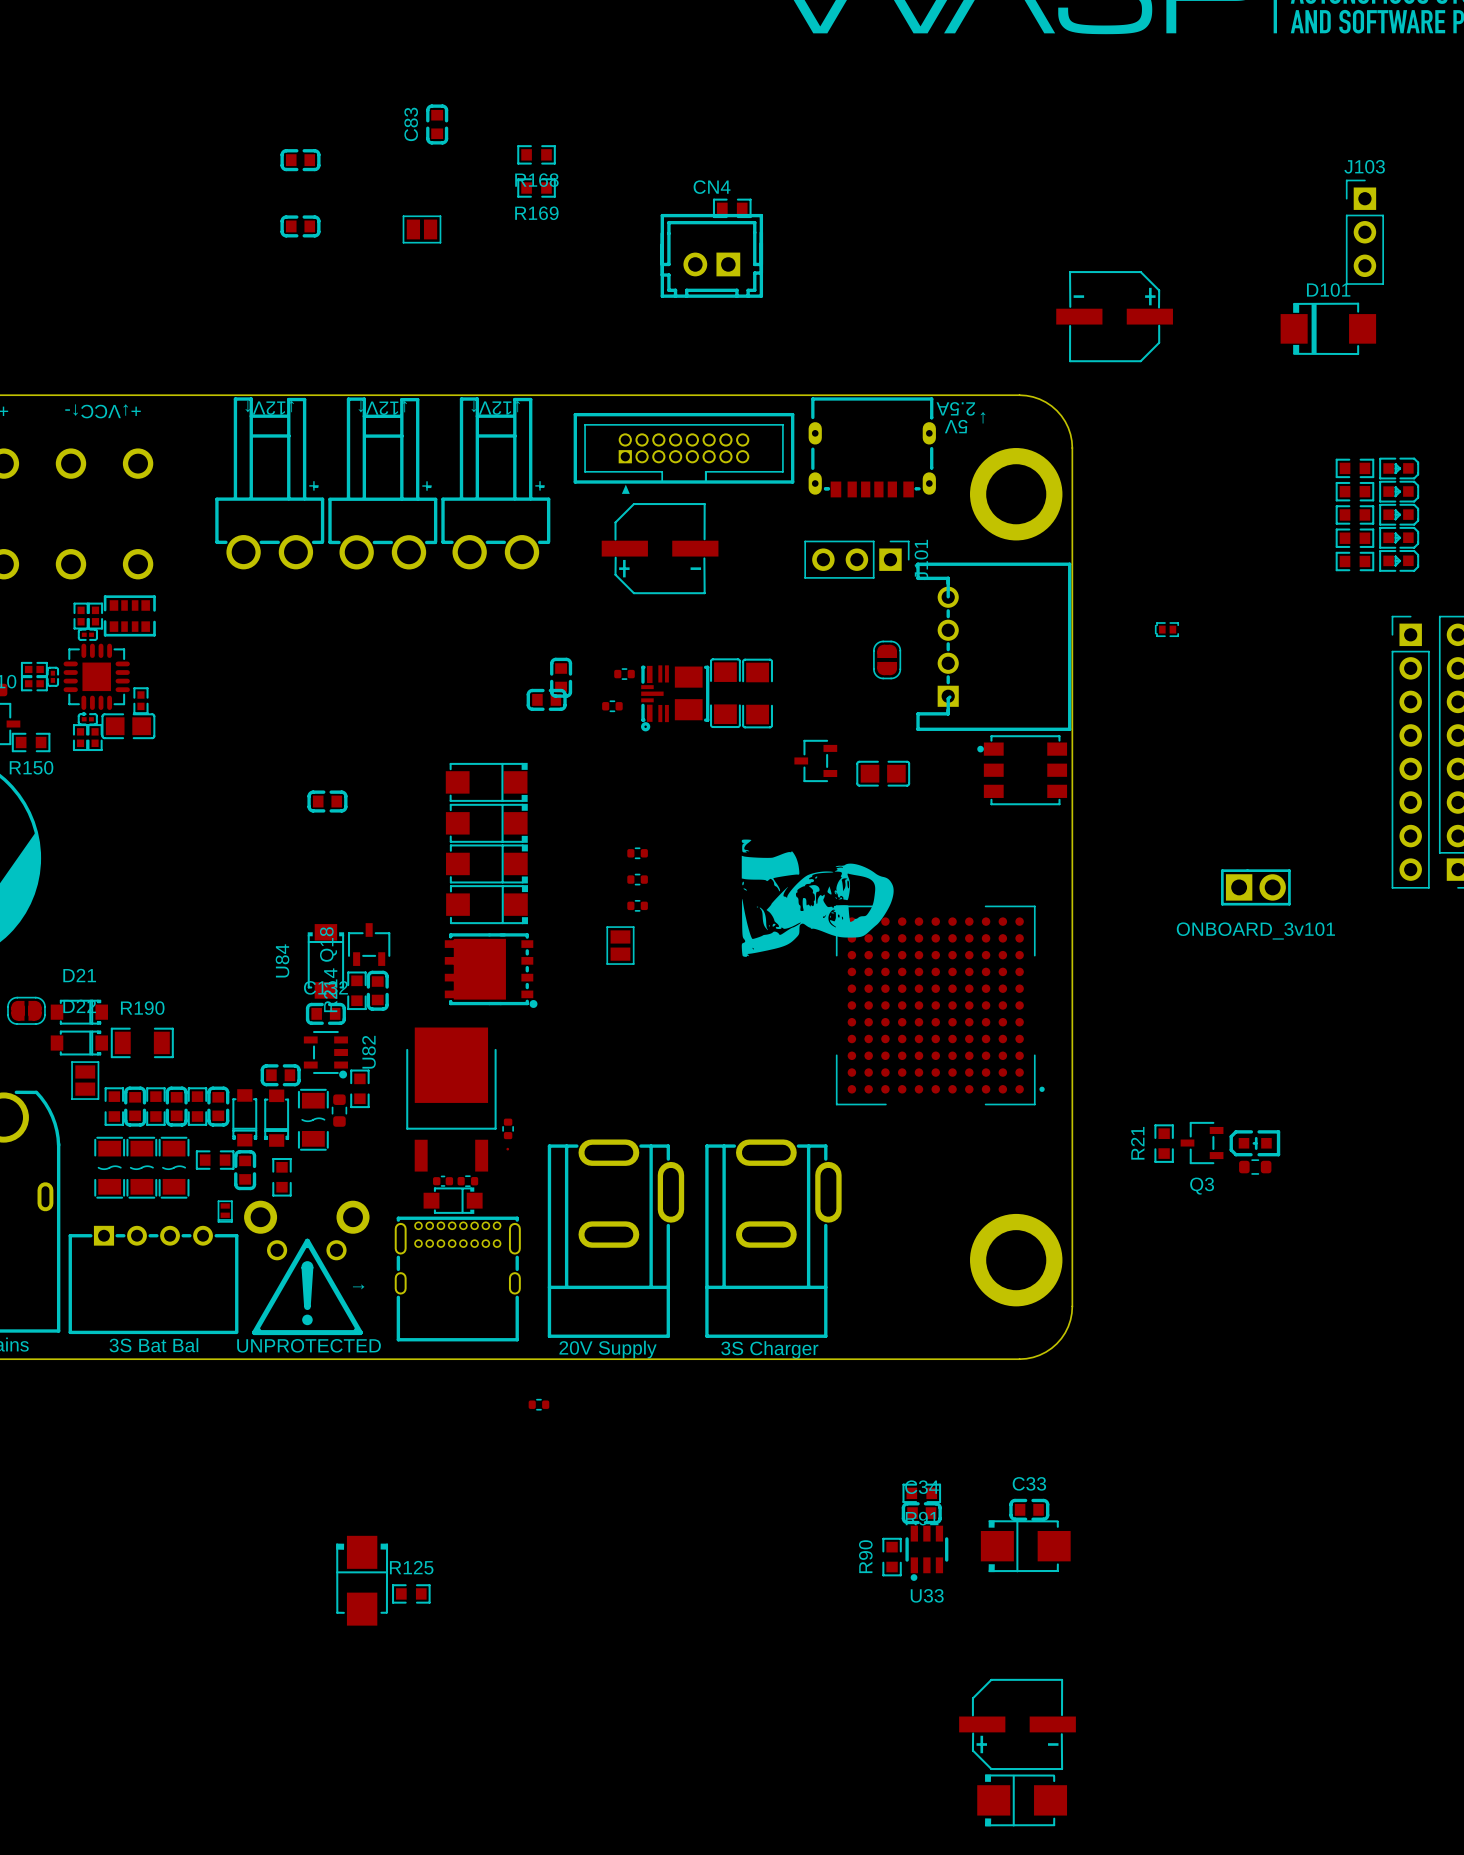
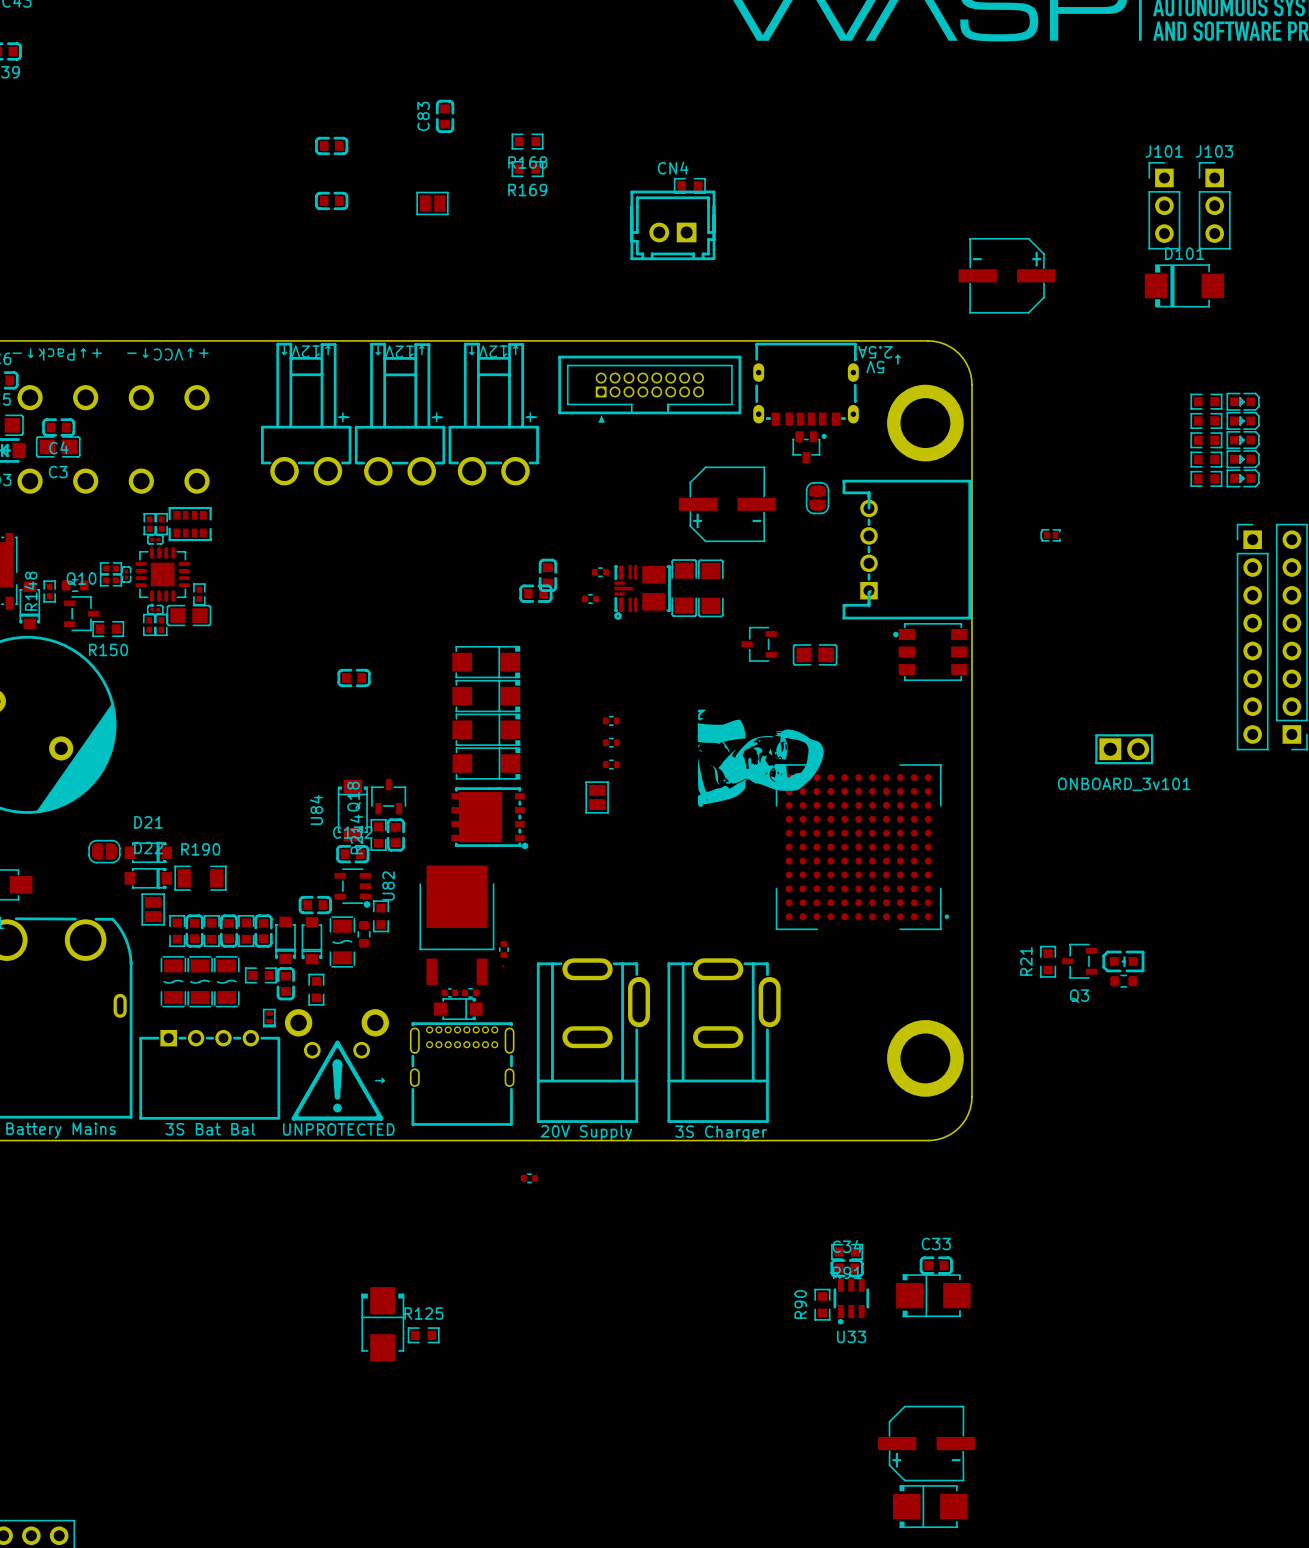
part: none -> (809, 447)
part position: (660, 548) -> (727, 504)
J101 rotation: 0° (856, 559) -> 90° counterclockwise (1164, 205)
J101 position: (856, 559) -> (1164, 205)
part position: (887, 659) -> (817, 498)

